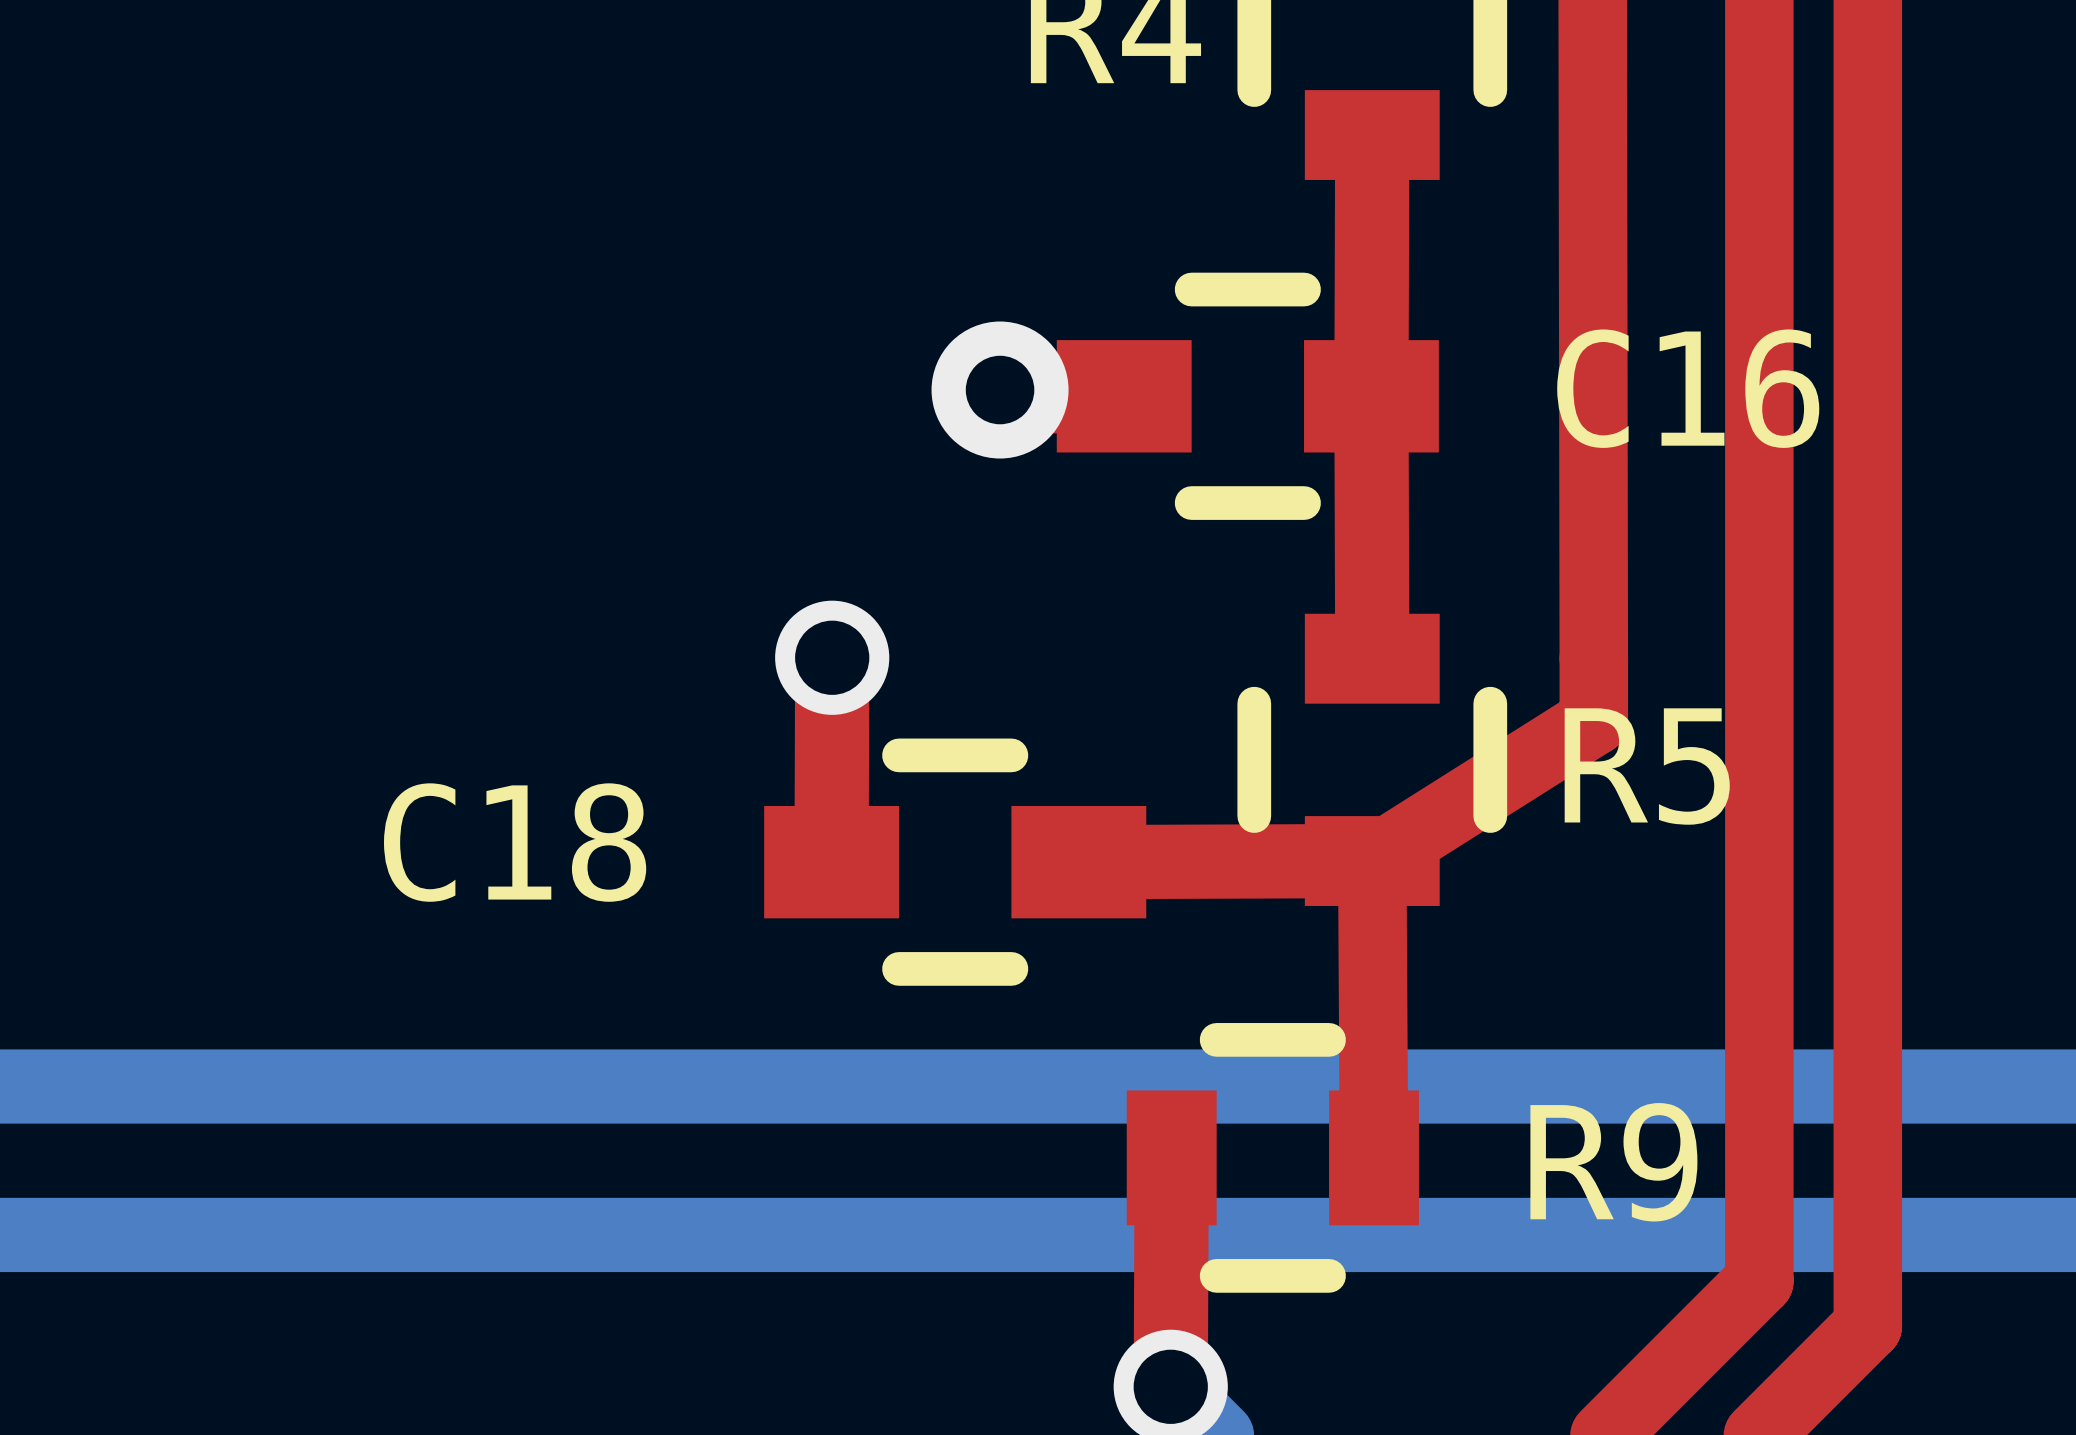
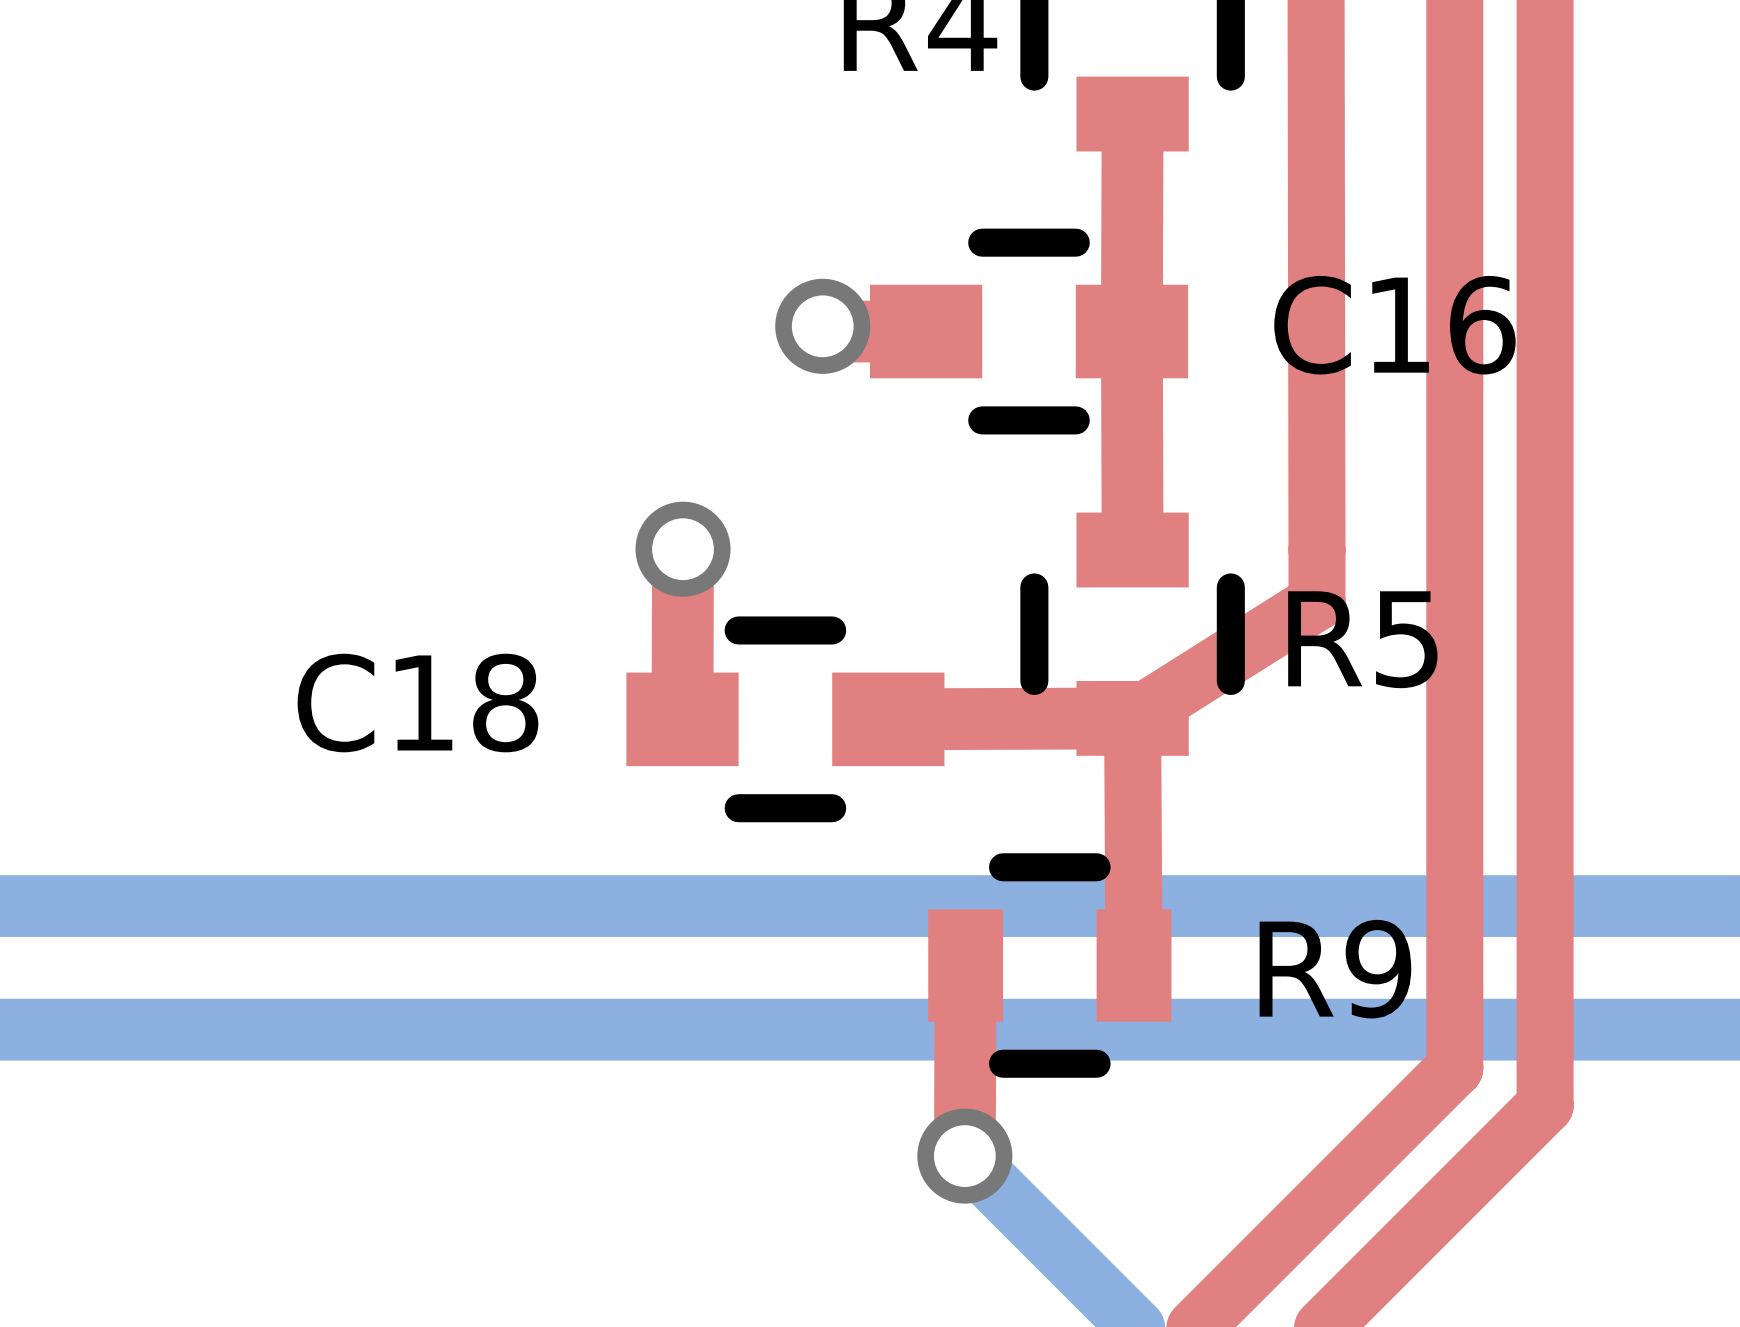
via size: [931, 321, 1069, 459] -> [775, 278, 871, 374]

